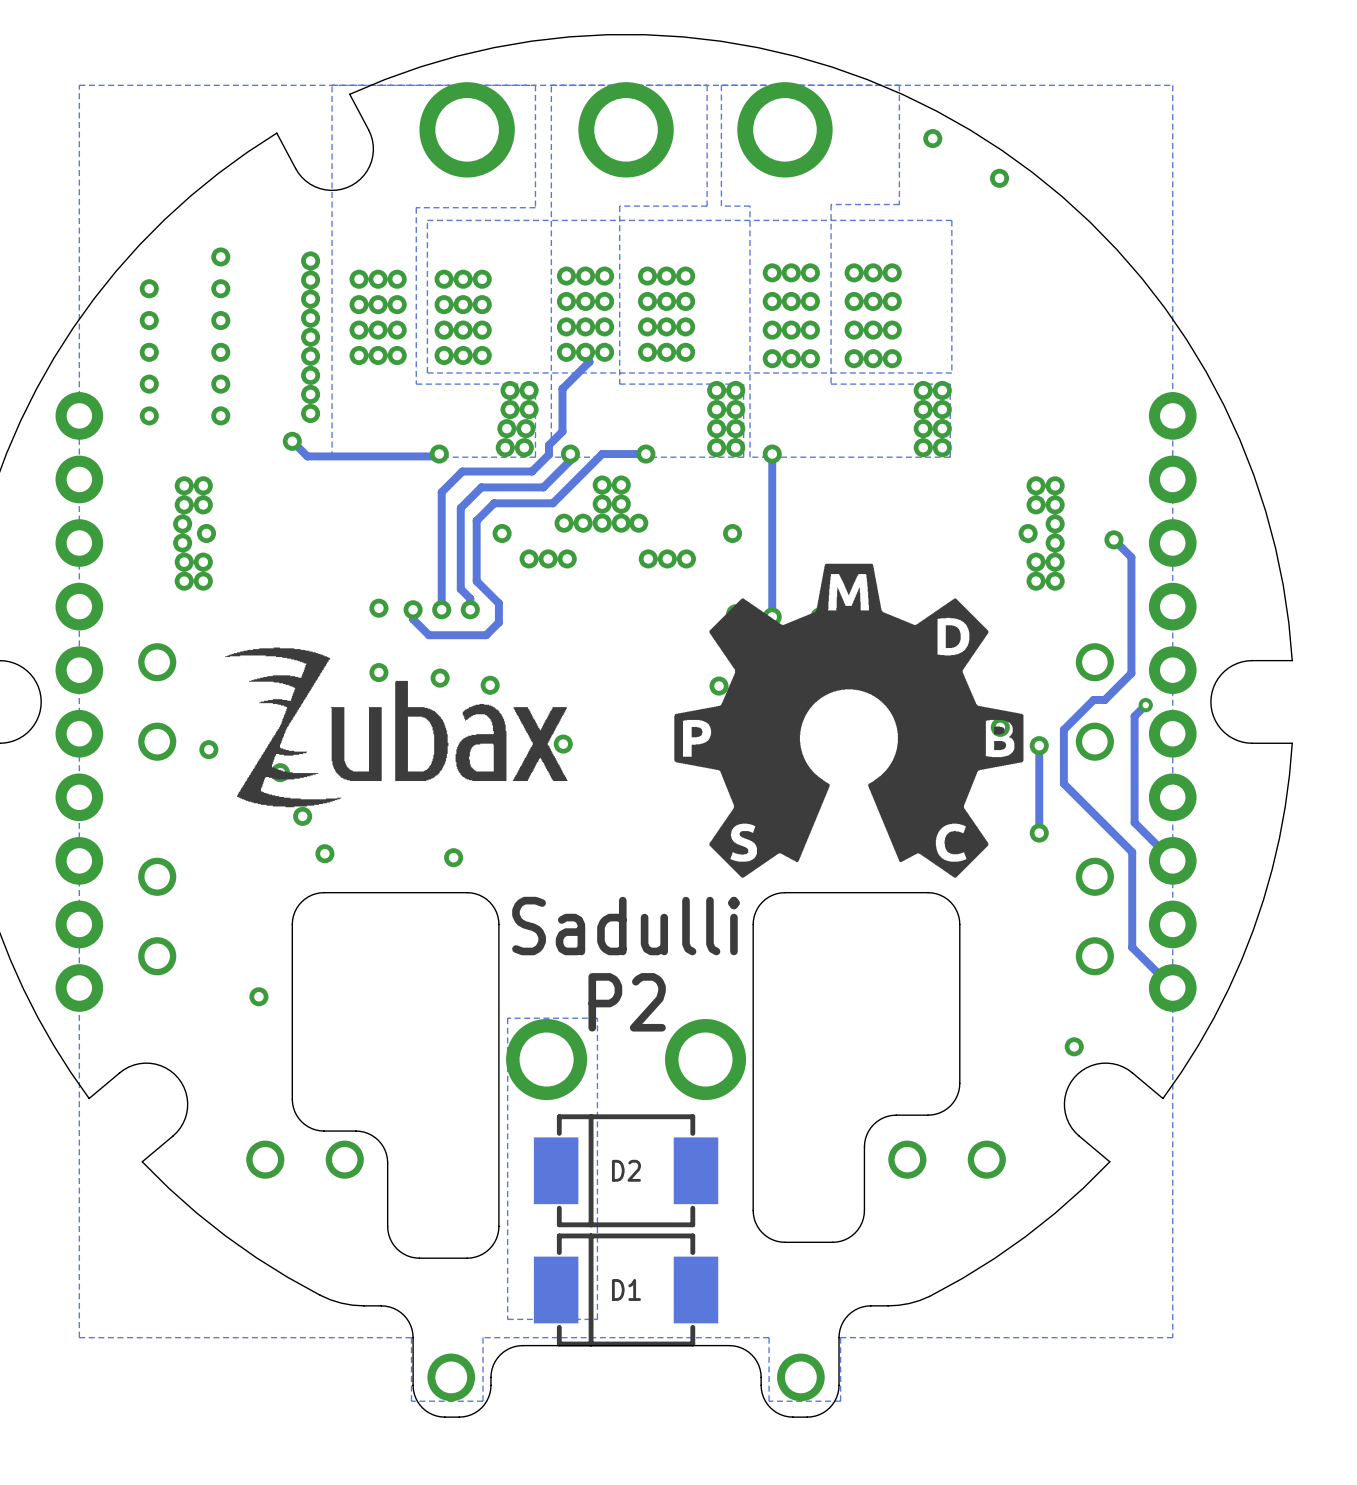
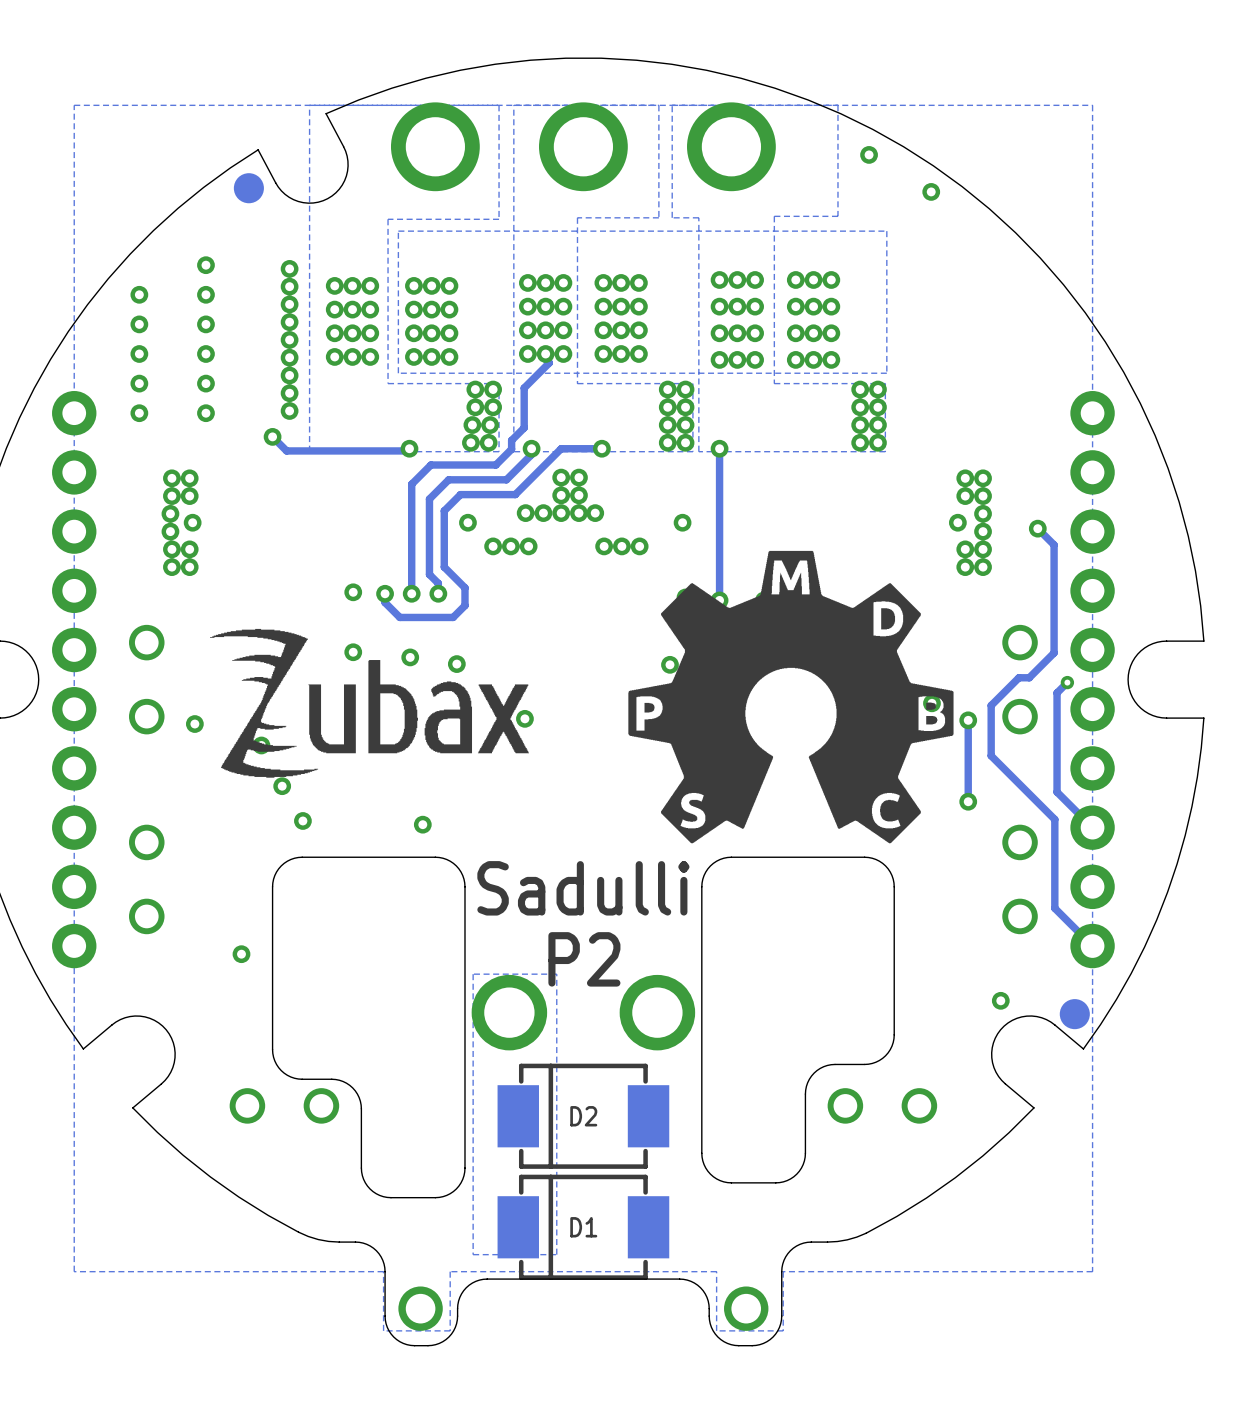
part: none -> (248, 188)
part: none -> (1074, 1014)

